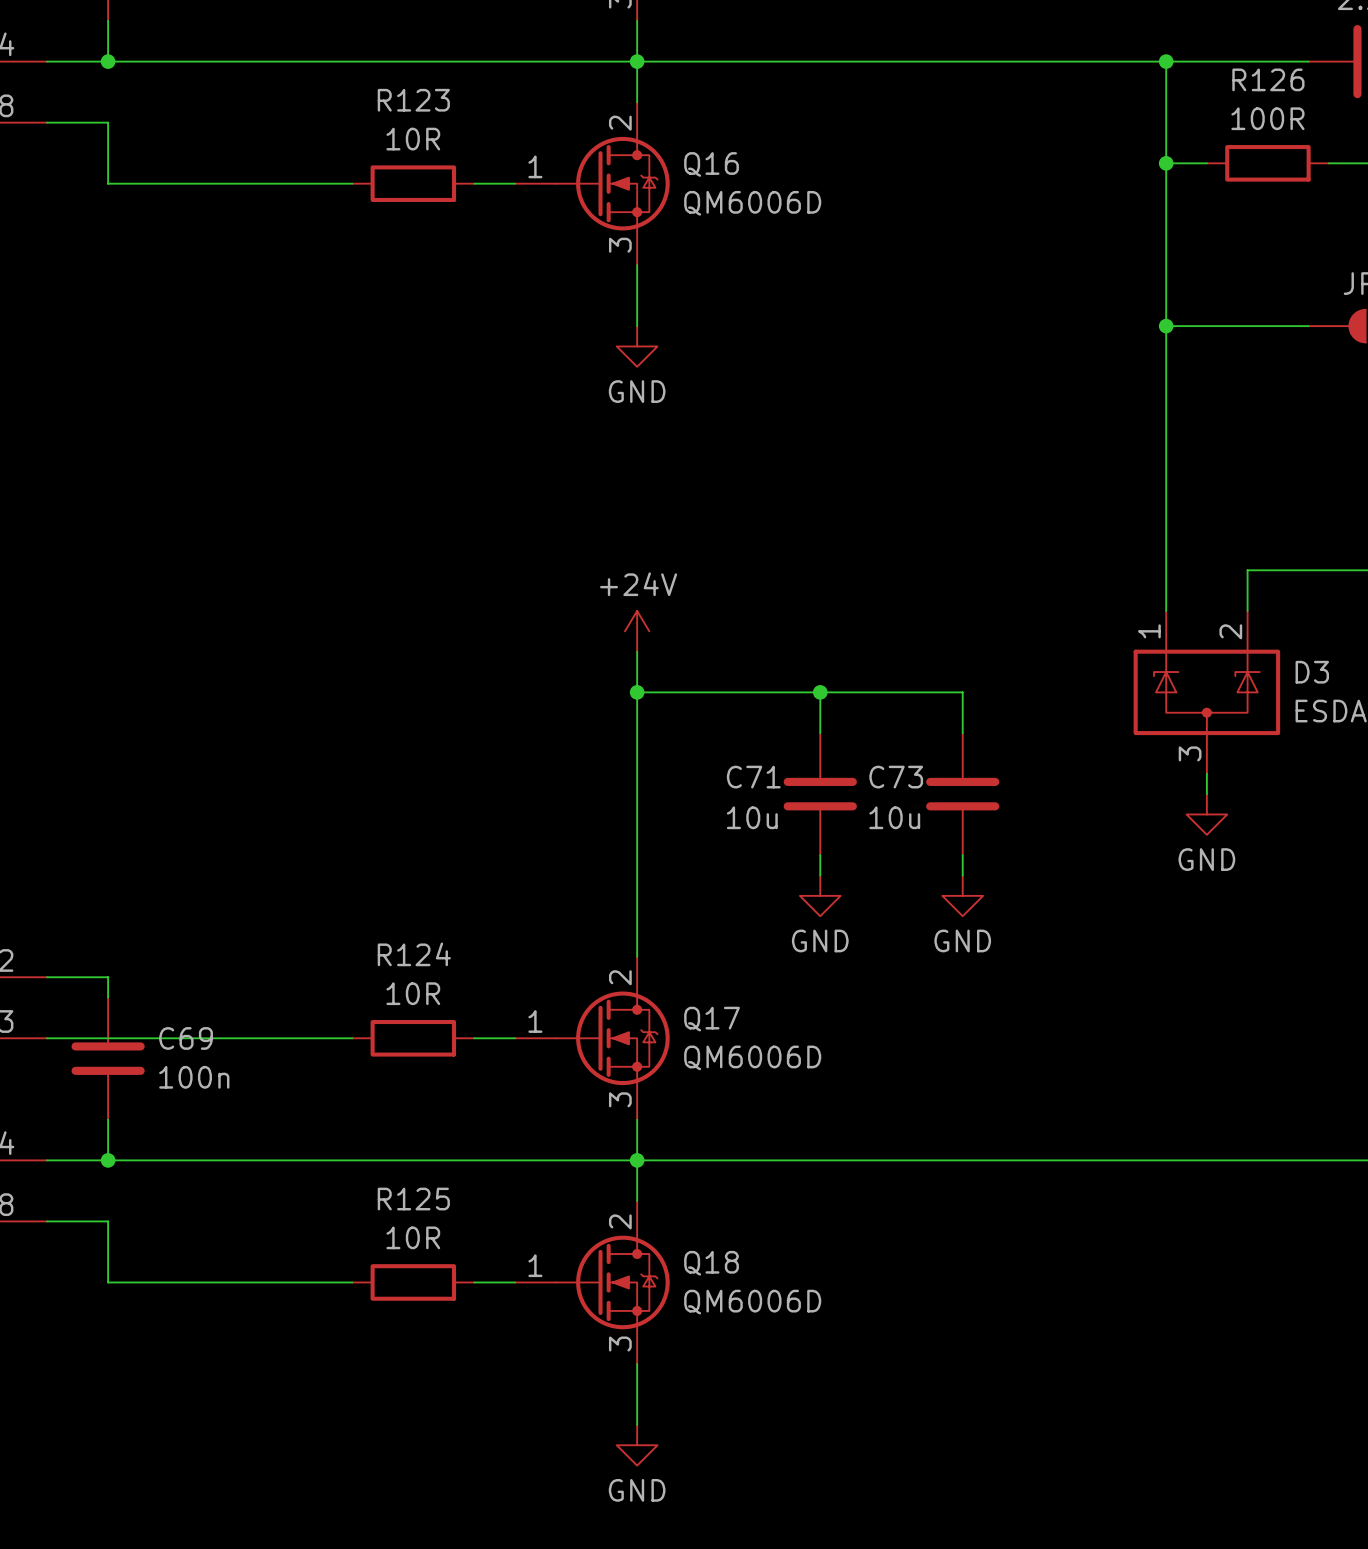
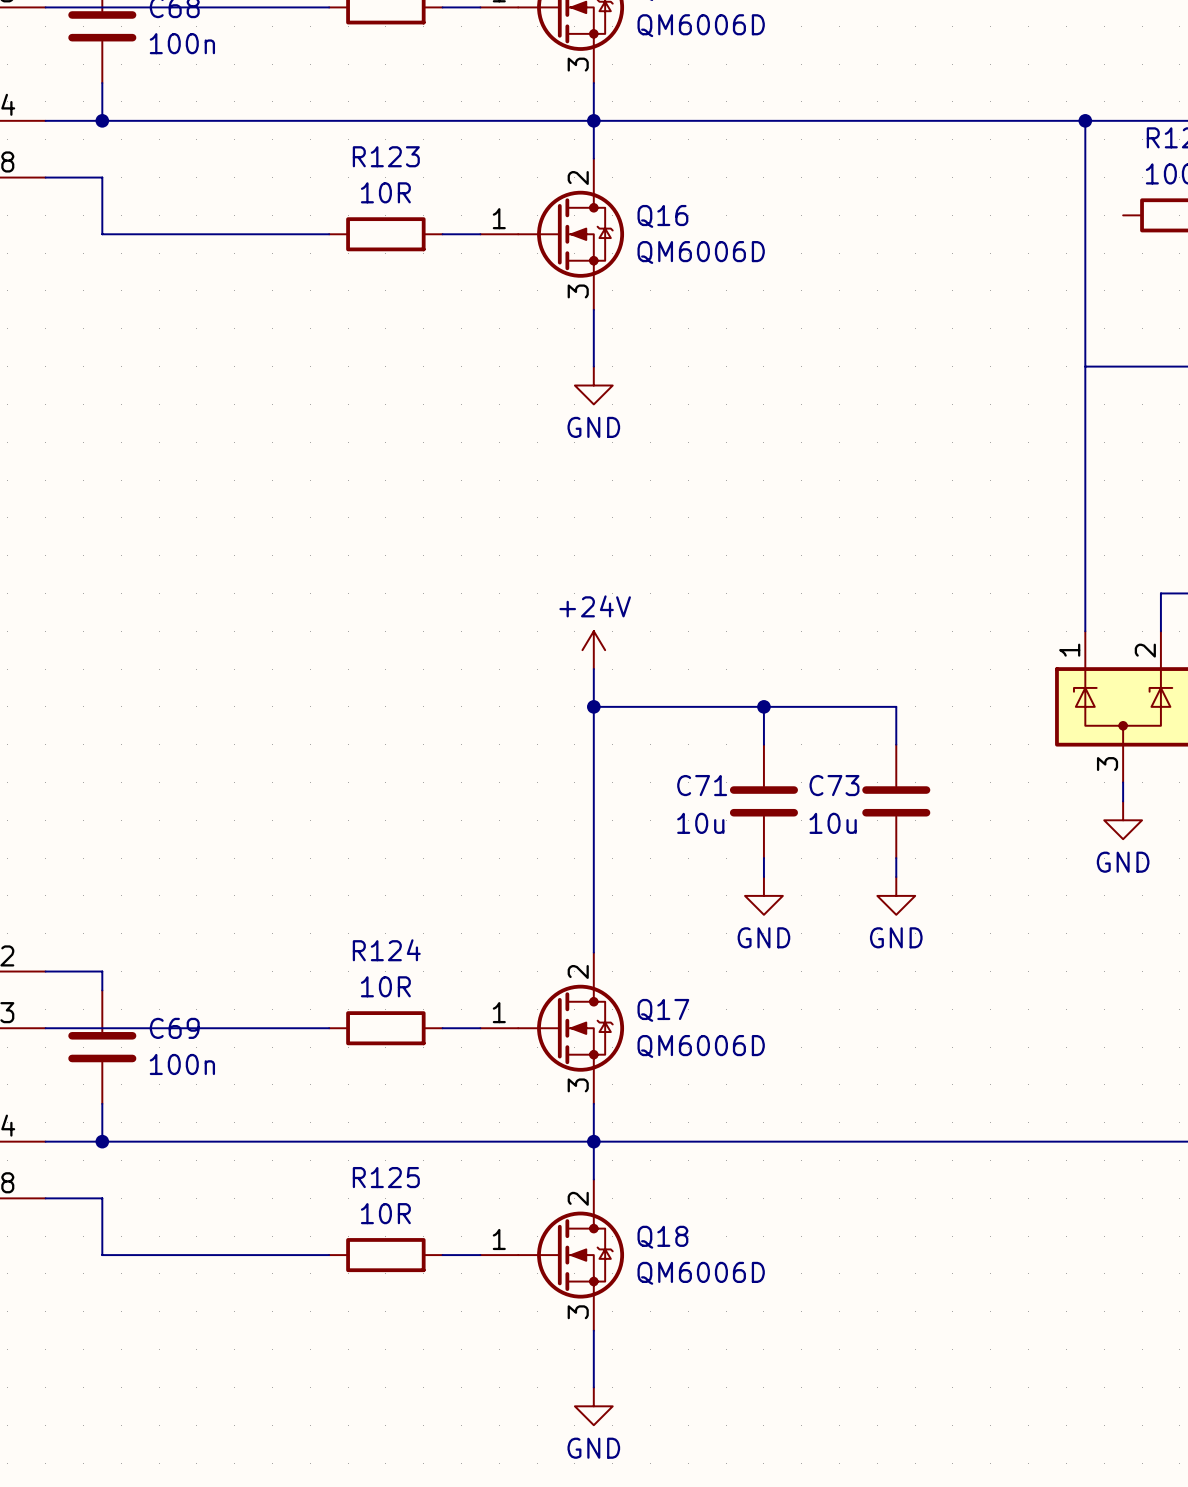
wire: (1166, 163) (1206, 163) -> none
junction: (1166, 163) -> none
junction: (1166, 326) -> none

